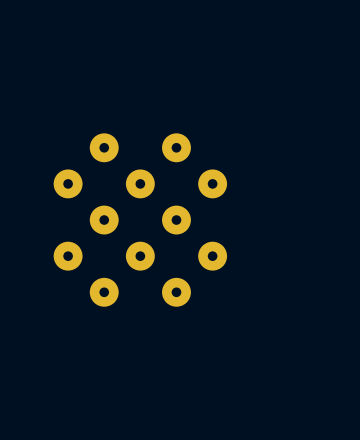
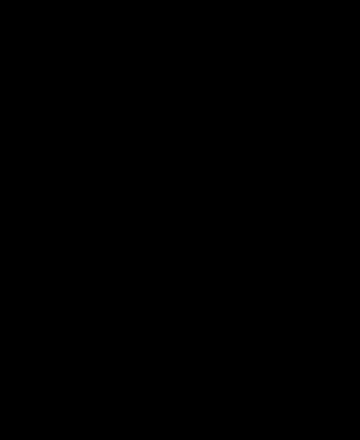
part: (140, 220) -> none

